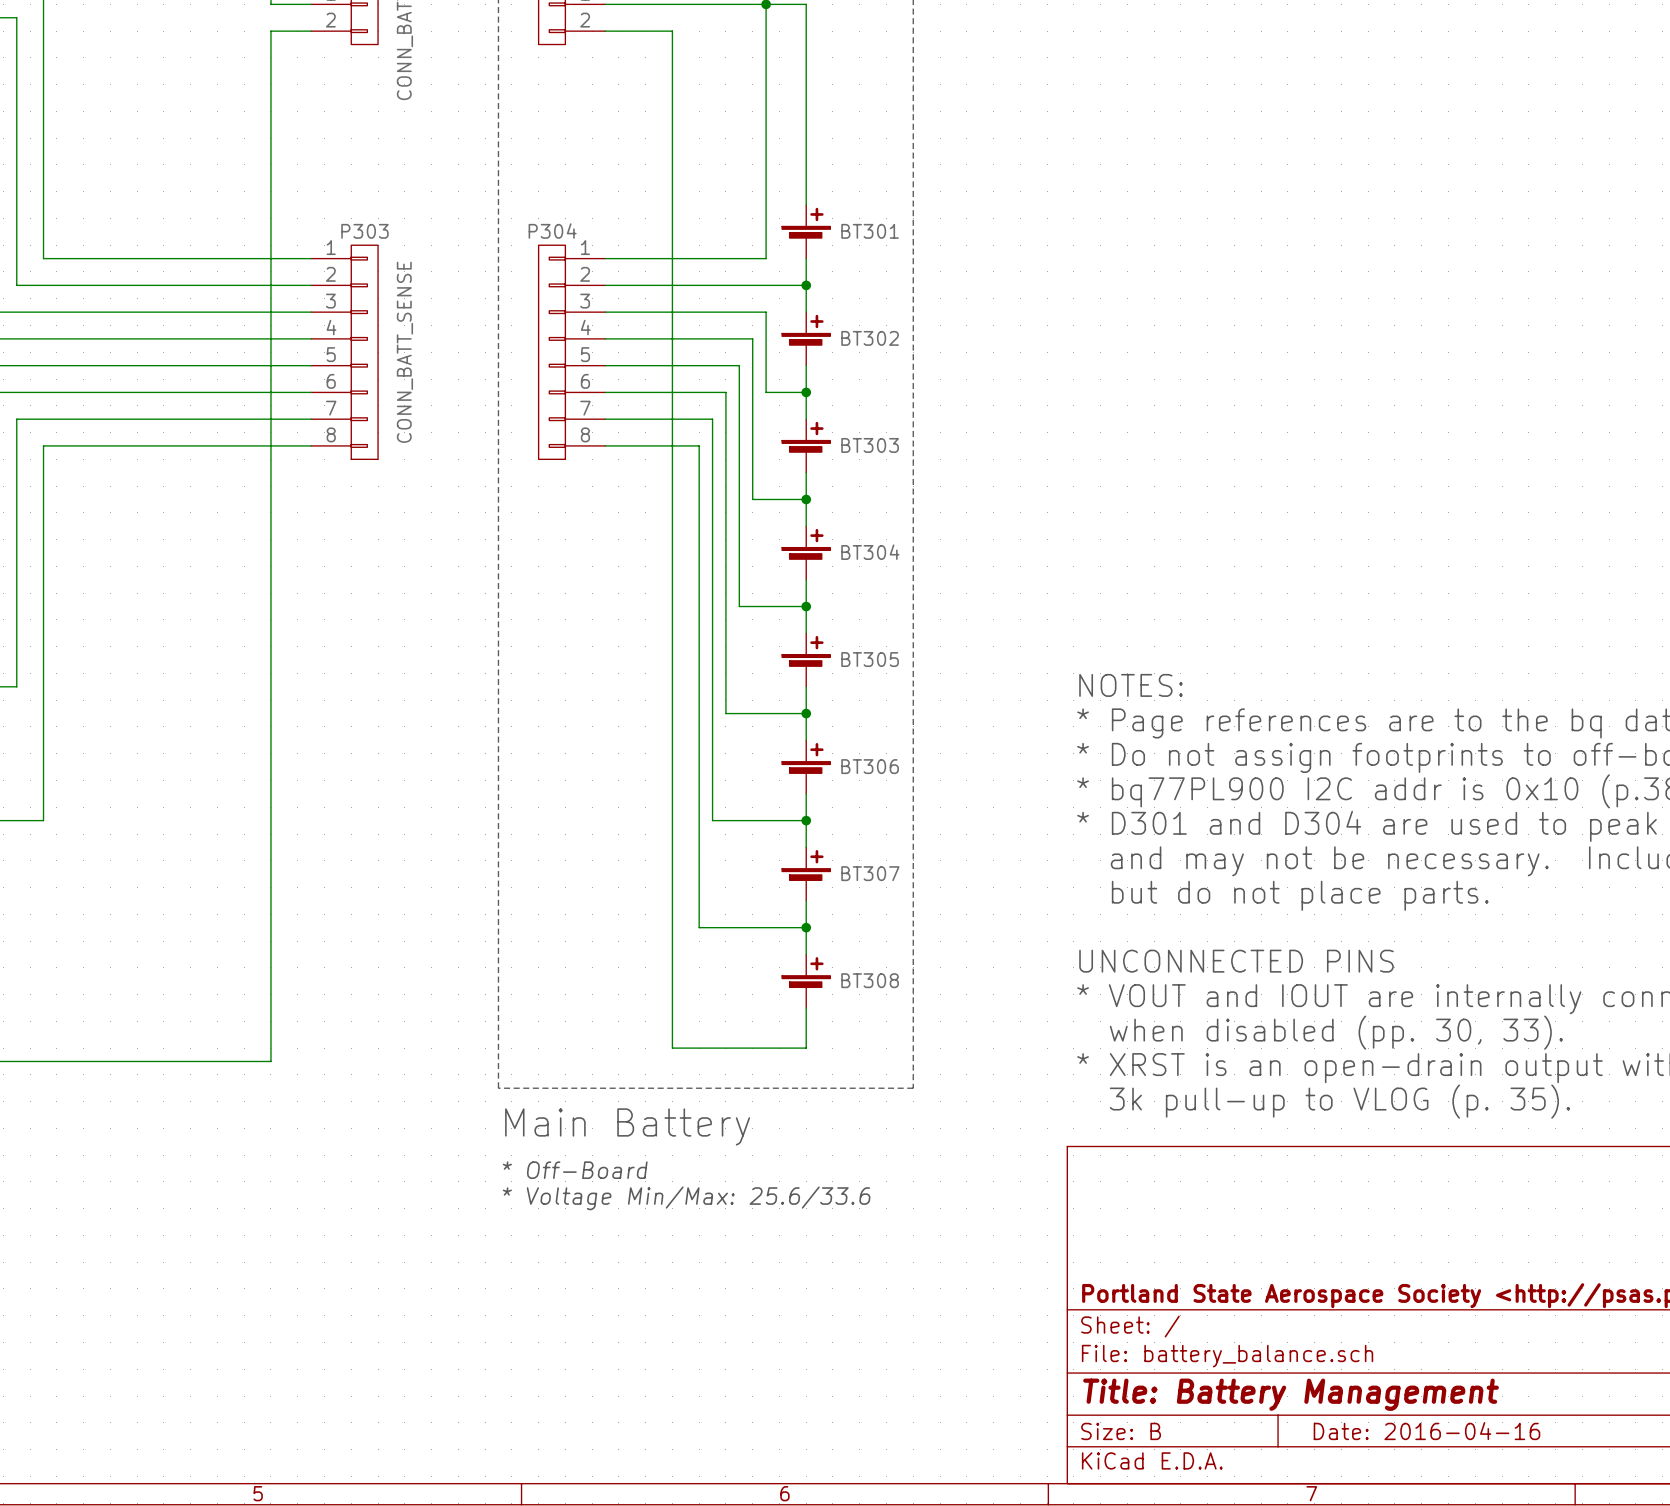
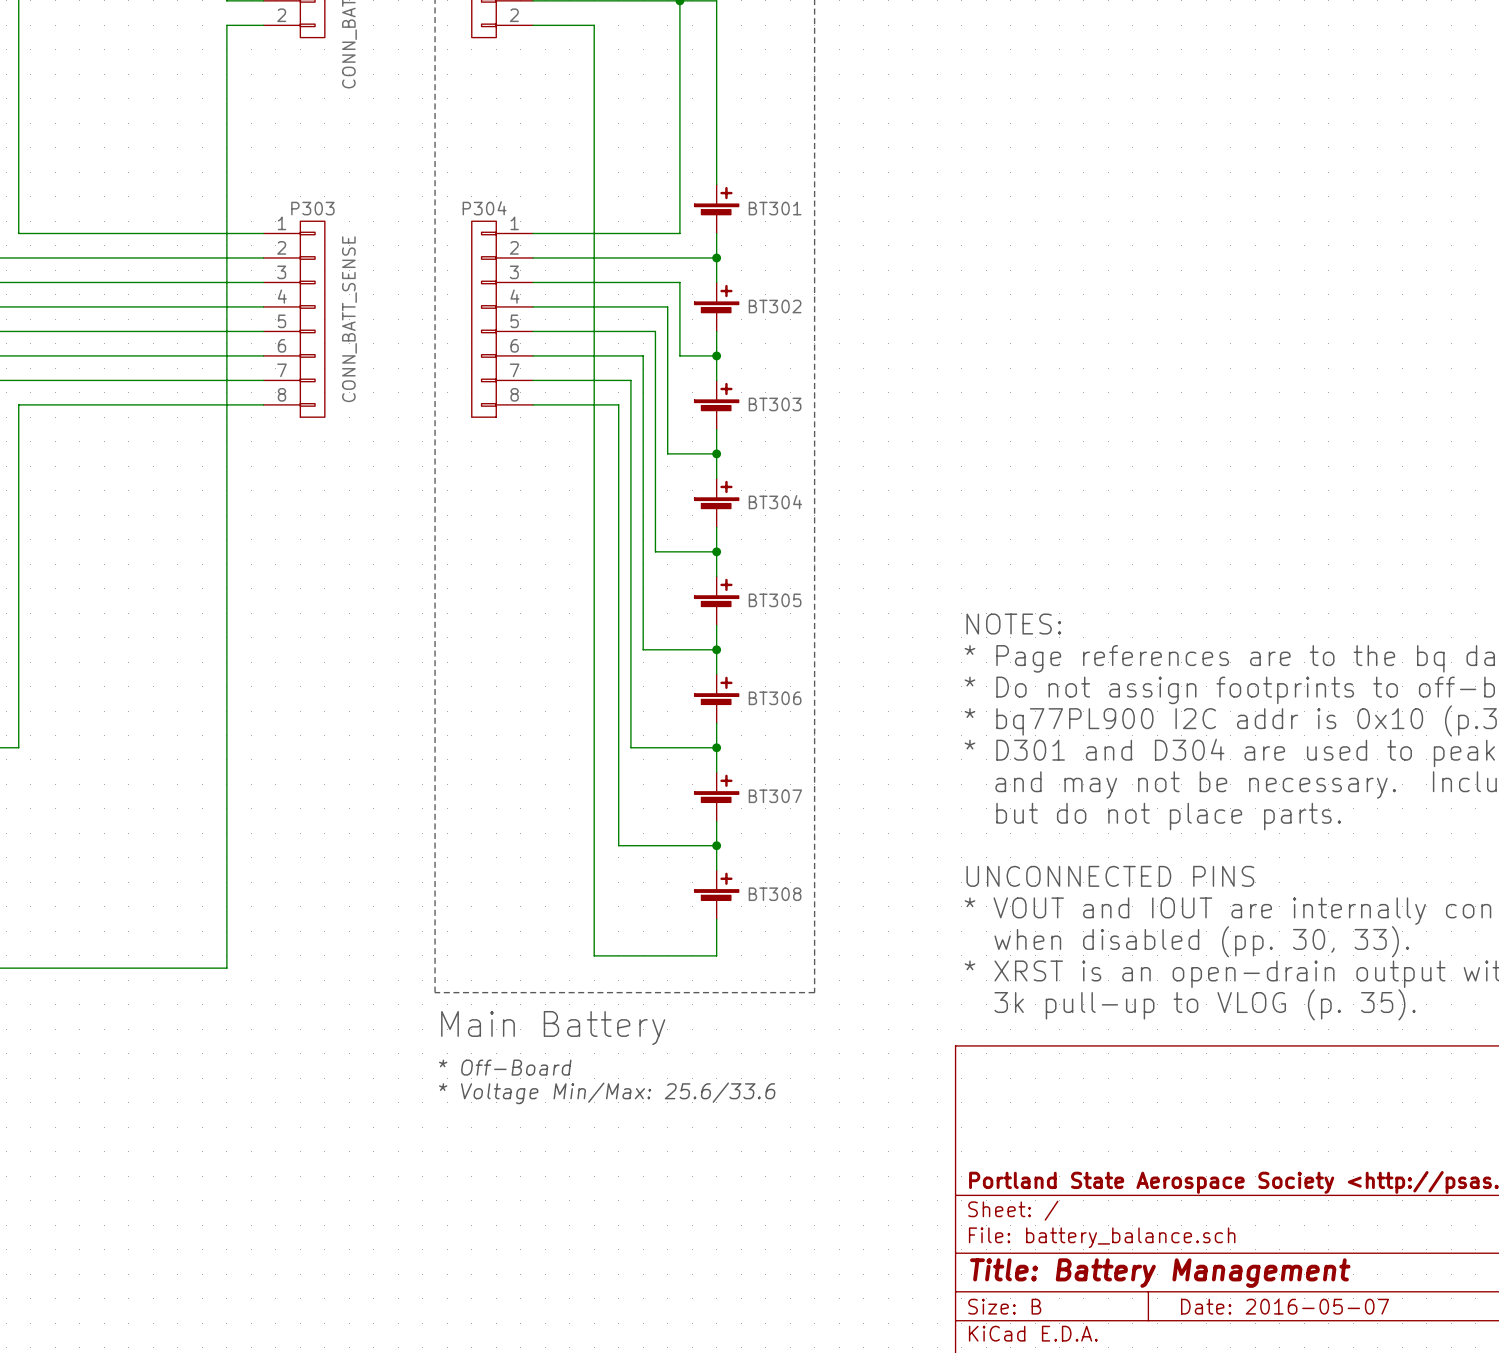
title block: Date: 2016-04-16 (1426, 1431) -> Date: 2016-05-07 (1285, 1306)

